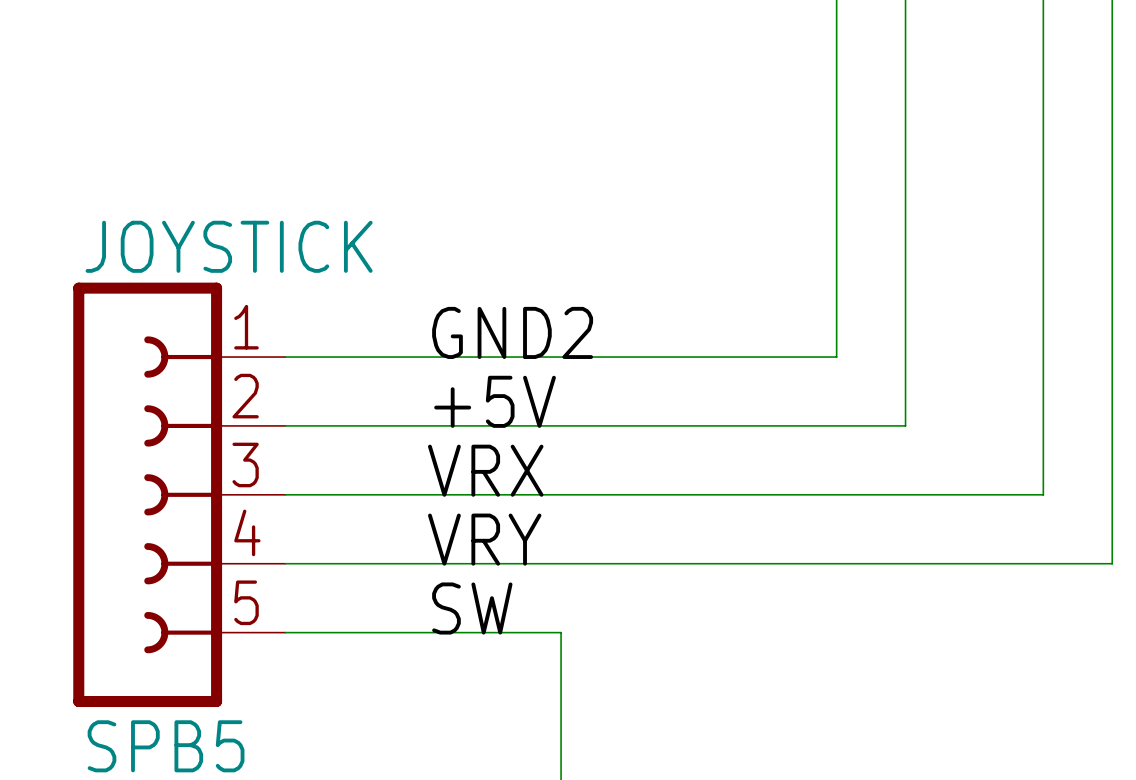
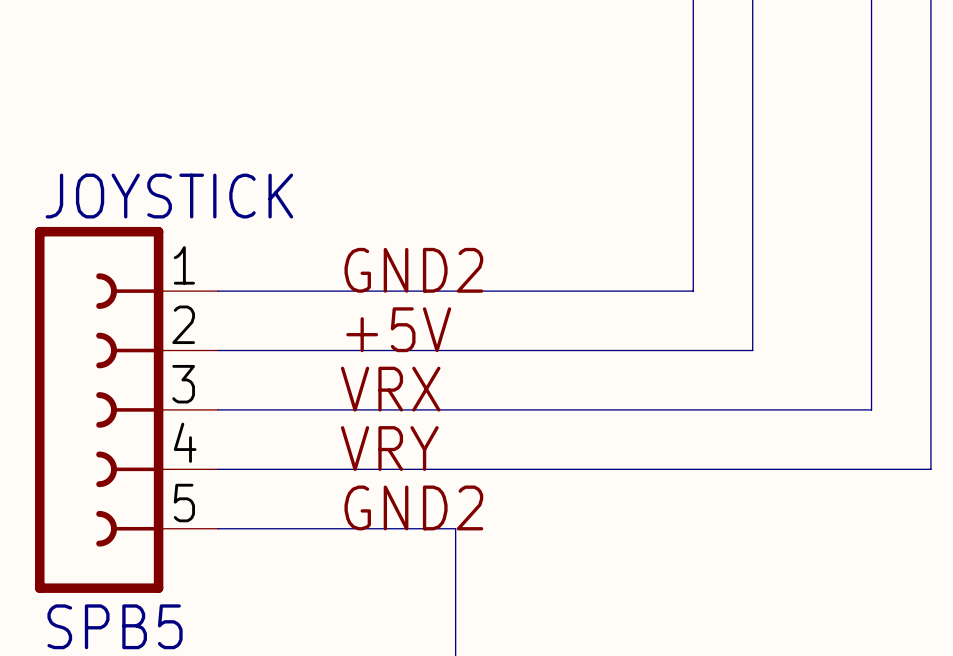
label: SW (472, 608) -> GND2 (413, 507)

